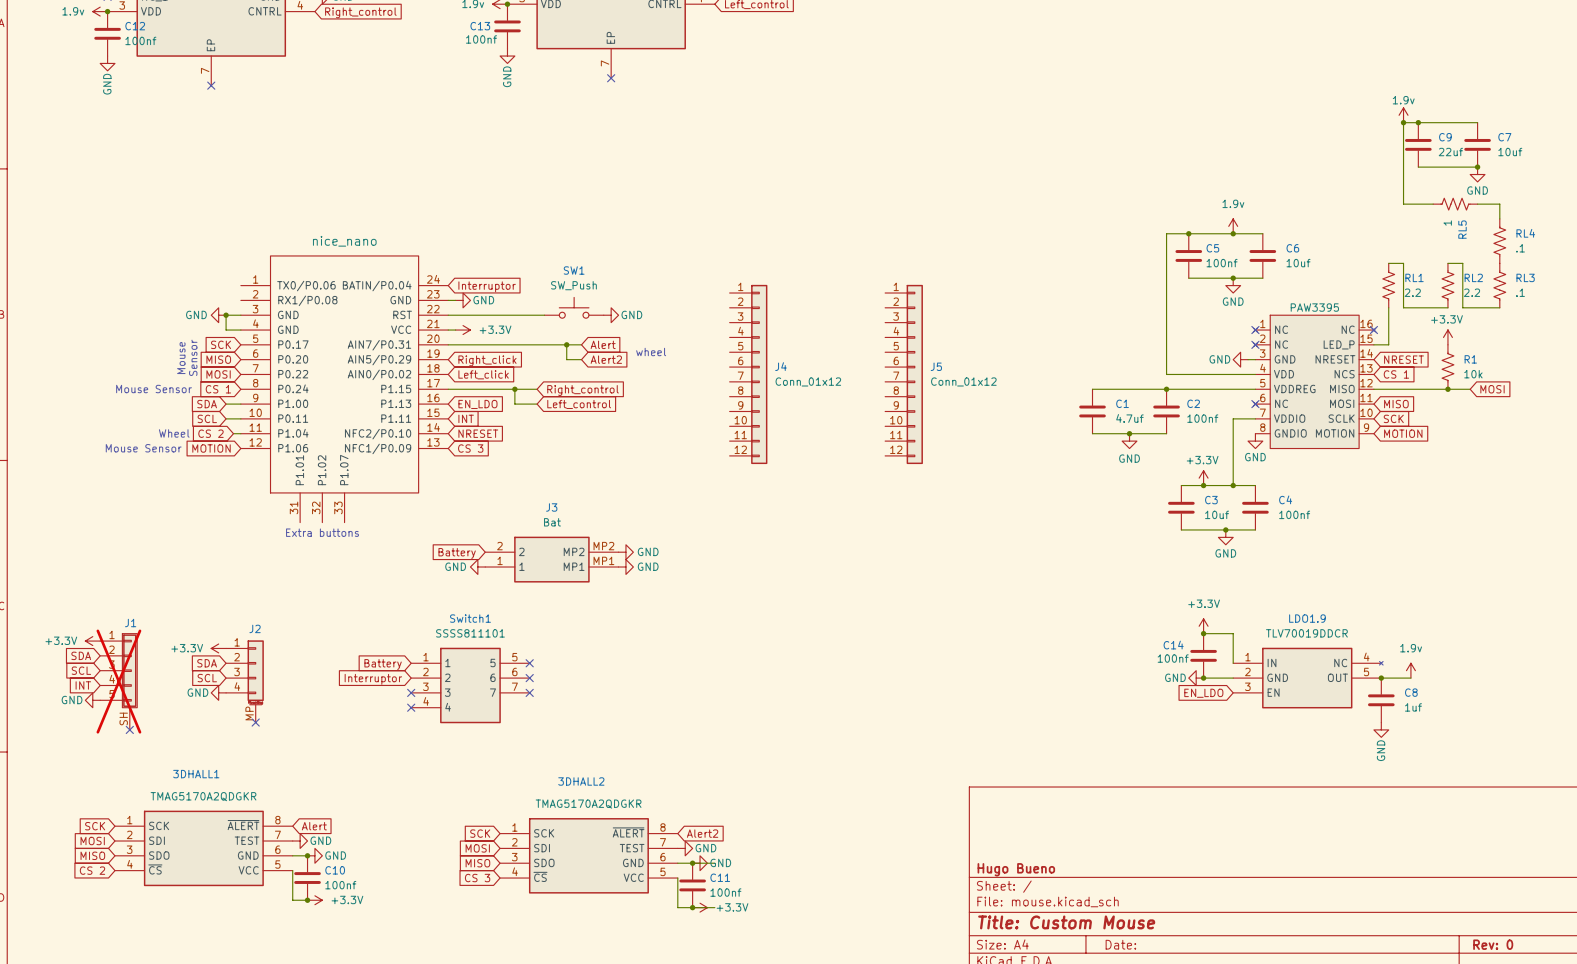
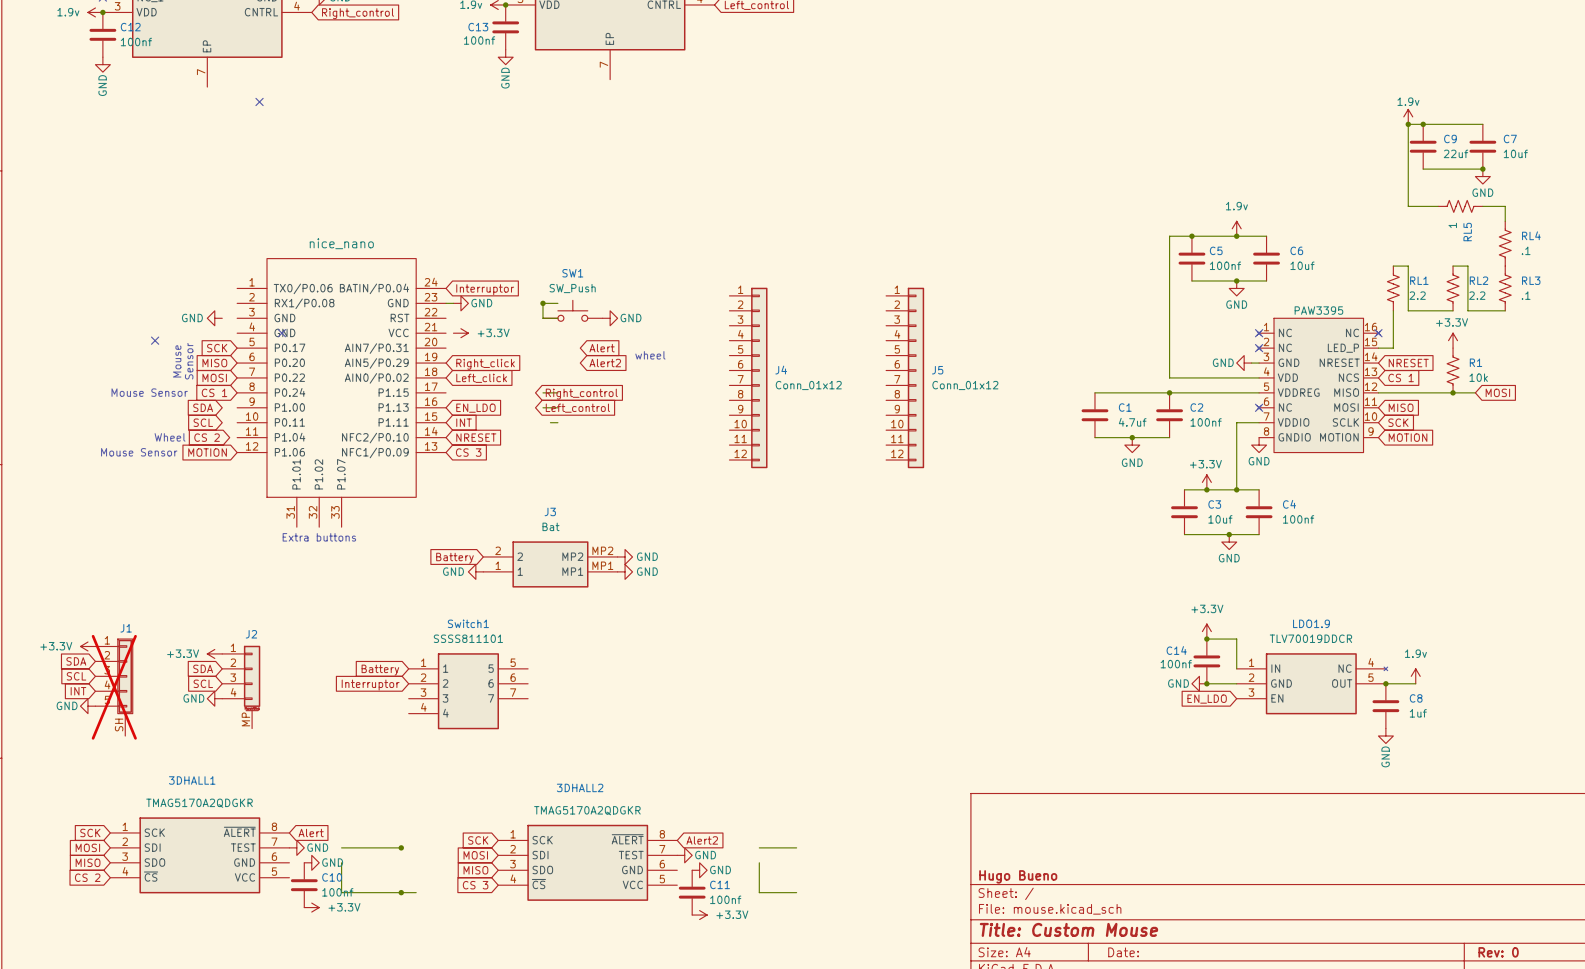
no-connect mark: (611, 78) -> none
no-connect mark: (211, 85) -> none
no-connect mark: none -> (259, 101)
junction: none -> (542, 303)
wire: none -> (557, 303) (542, 303) (542, 318) (557, 318)
junction: (226, 315) -> none
wire: (240, 315) (226, 315) (226, 330) (240, 330) -> none
wire: (448, 315) (544, 315) -> none
no-connect mark: none -> (281, 333)
wire: (448, 330) (455, 330) -> (550, 422) (557, 422)
no-connect mark: none -> (155, 340)
wire: (448, 344) (581, 344) -> none
wire: (566, 344) (566, 359) (581, 359) -> none
junction: (566, 344) -> none
wire: (448, 389) (537, 389) -> none
wire: (514, 389) (514, 404) (537, 404) -> none
junction: (514, 389) -> none
wire: none -> (542, 392) (557, 392)
wire: (226, 404) (240, 404) -> none
wire: none -> (542, 407) (557, 407)
wire: (226, 418) (240, 418) -> none
wire: (233, 433) (240, 433) -> none
no-connect mark: (529, 663) -> none
no-connect mark: (529, 678) -> none
no-connect mark: (411, 692) -> none
no-connect mark: (529, 692) -> none
no-connect mark: (411, 707) -> none
no-connect mark: (255, 722) -> none
no-connect mark: (129, 729) -> none
wire: none -> (341, 847) (401, 847)
junction: none -> (401, 847)
wire: (292, 855) (307, 855) -> none
junction: (307, 855) -> none
wire: none -> (341, 862) (341, 892) (416, 892)
wire: (677, 863) (714, 863) -> (759, 847) (796, 847)
junction: (692, 863) -> none
wire: (292, 870) (292, 900) (307, 900) -> none
wire: (677, 878) (677, 907) (714, 907) -> (759, 862) (759, 892) (796, 892)
junction: none -> (401, 892)
junction: (307, 900) -> none
junction: (692, 907) -> none

